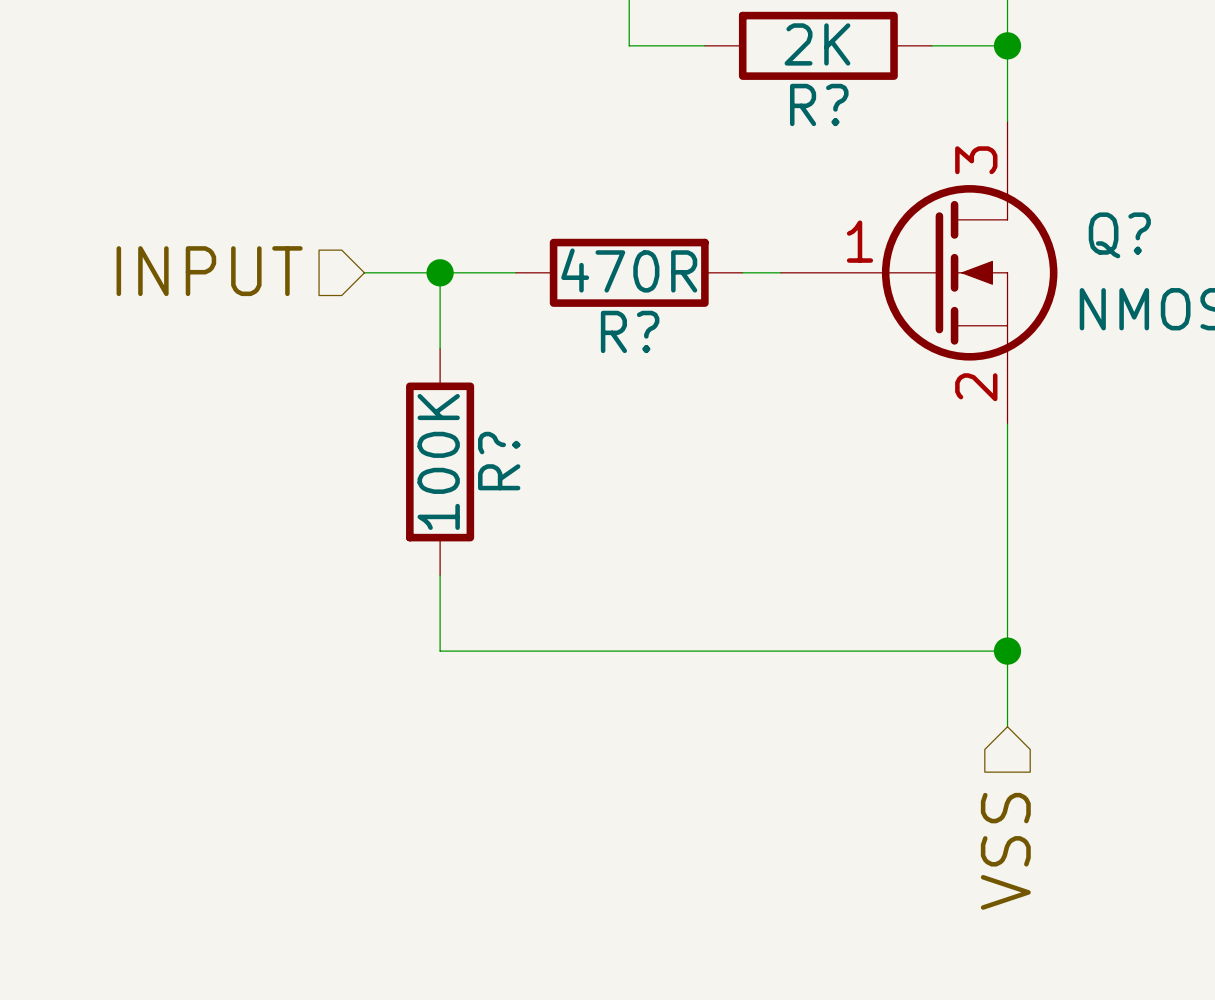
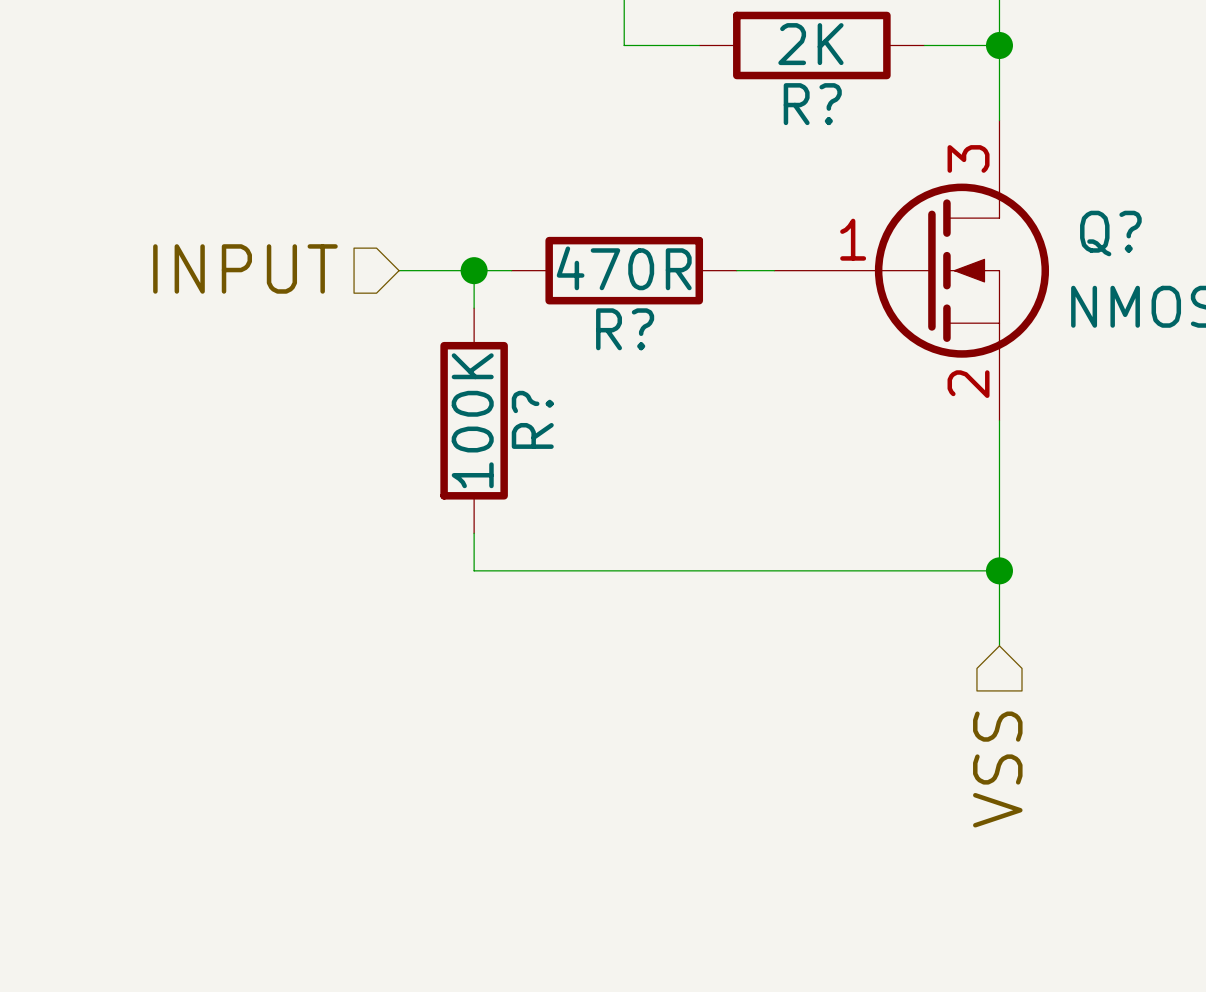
hierarchical label position: INPUT (209, 271) -> INPUT (245, 268)
wire: (364, 272) (402, 272) -> none
wire: (440, 272) (440, 348) -> none
junction position: (440, 272) -> (474, 270)
wire: none -> (474, 270) (474, 308)
R? position: (440, 461) -> (474, 420)
wire: none -> (474, 533) (474, 570) (999, 570)
wire: (440, 575) (440, 651) (1007, 651) (1007, 726) -> none
junction position: (1007, 651) -> (999, 570)
hierarchical label position: VSS (1005, 851) -> VSS (997, 769)

